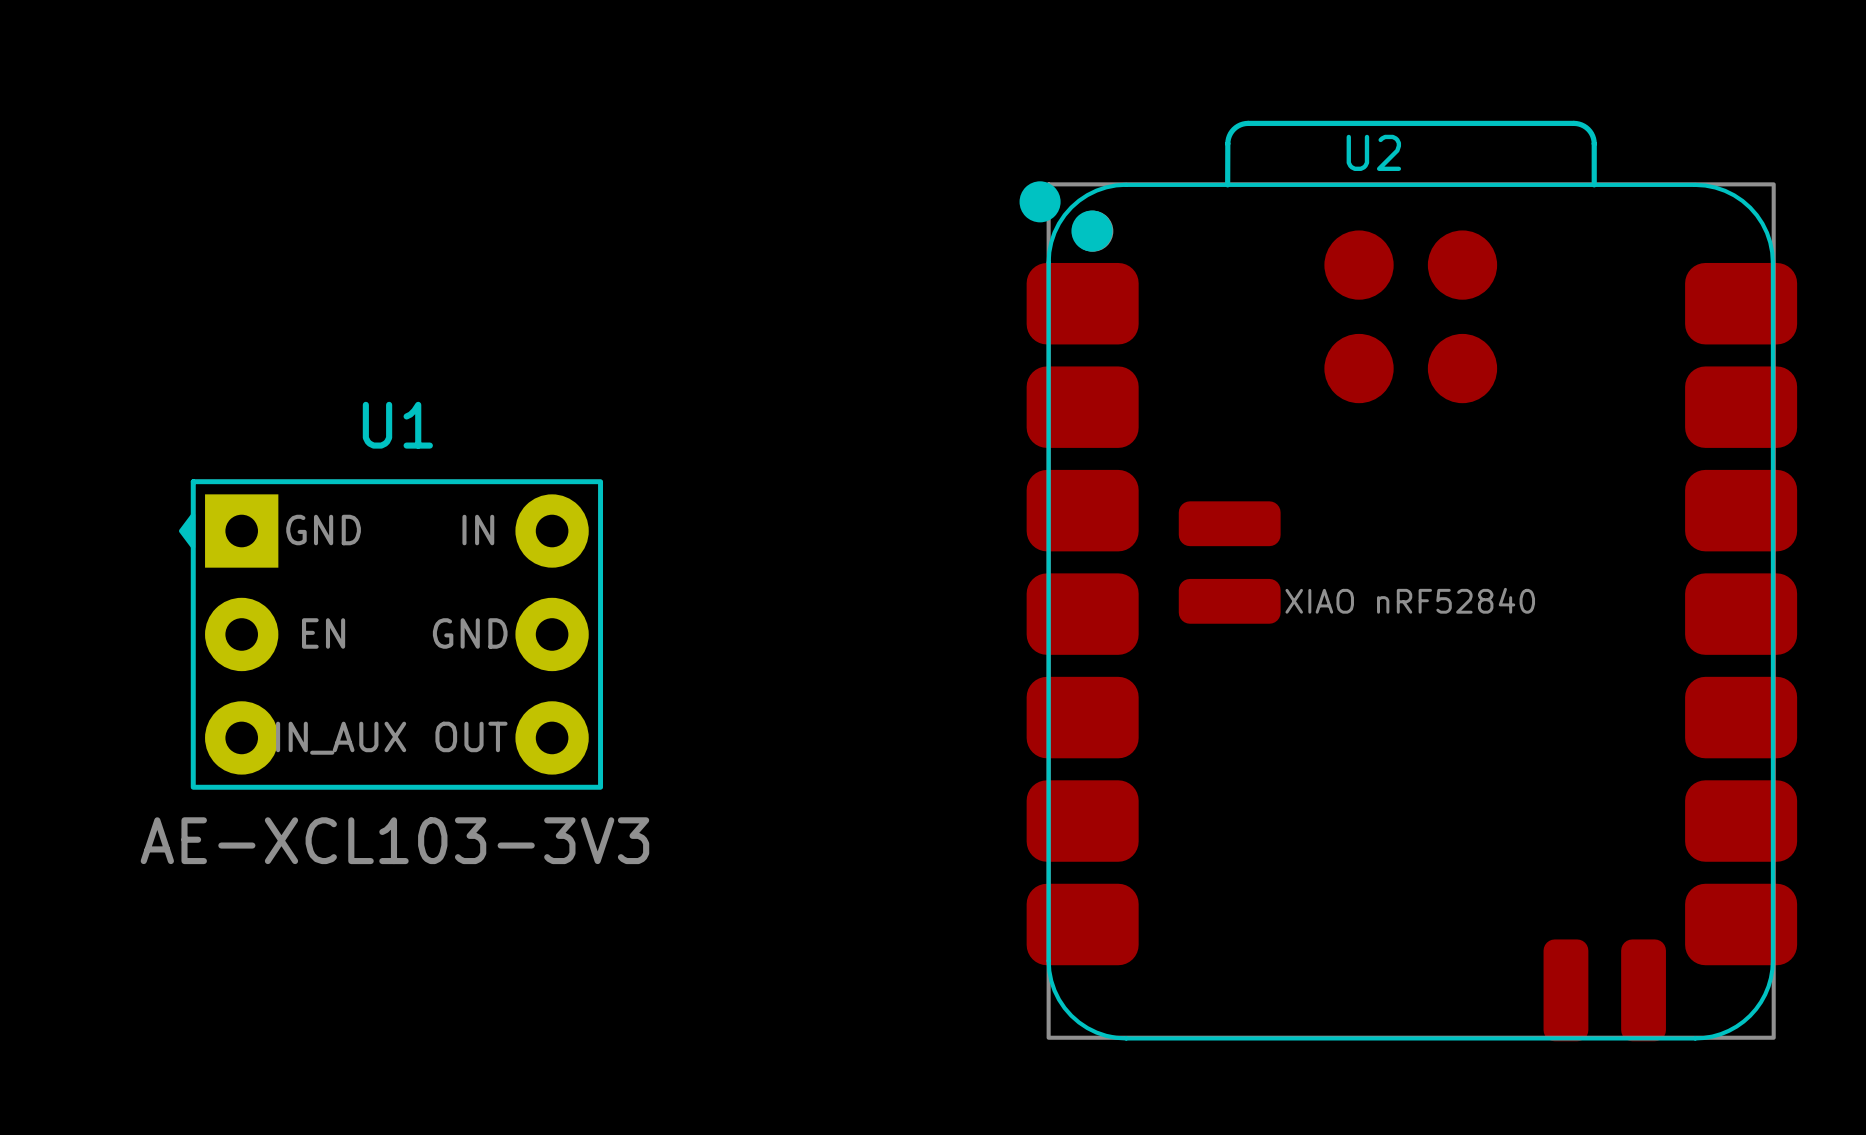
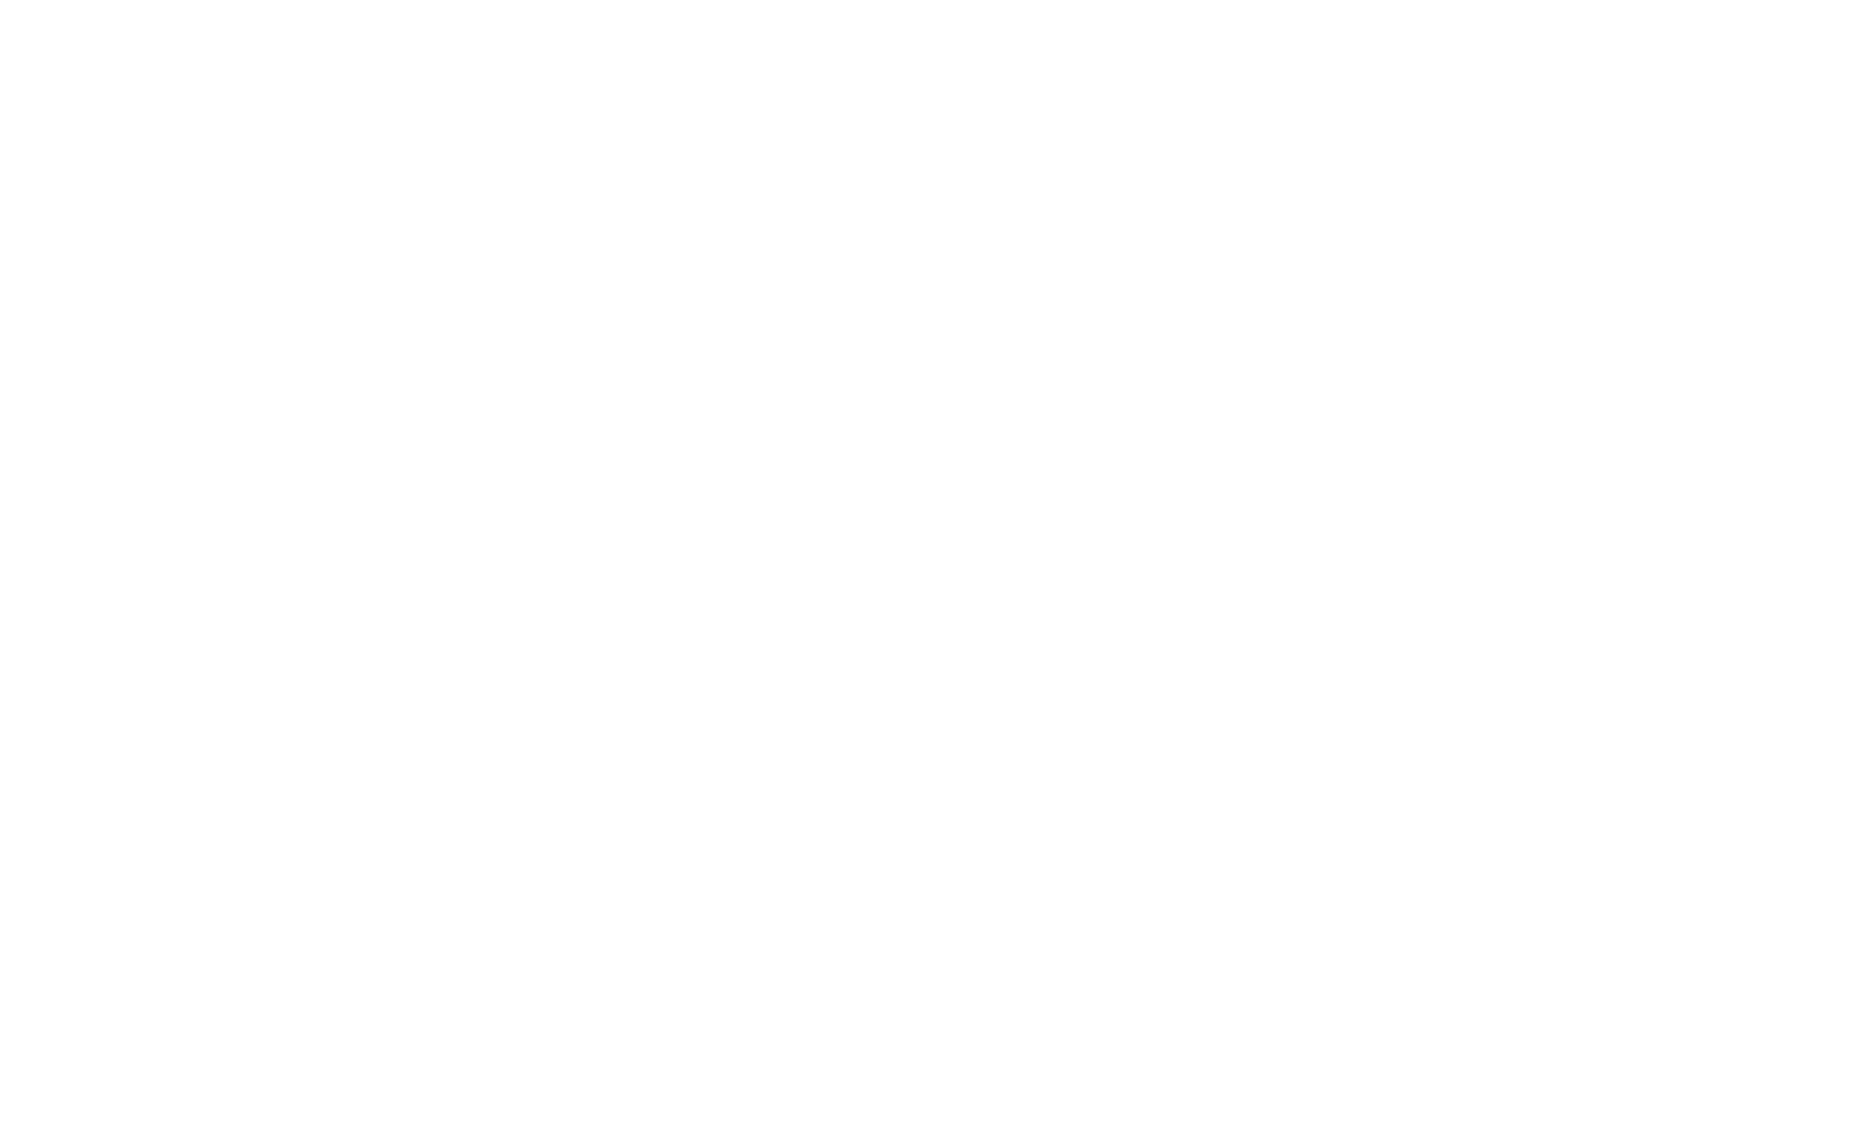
U2: XIAO nRF52840 (1408, 581) -> none
U1: AE-XCL103-3V3 (390, 634) -> none

